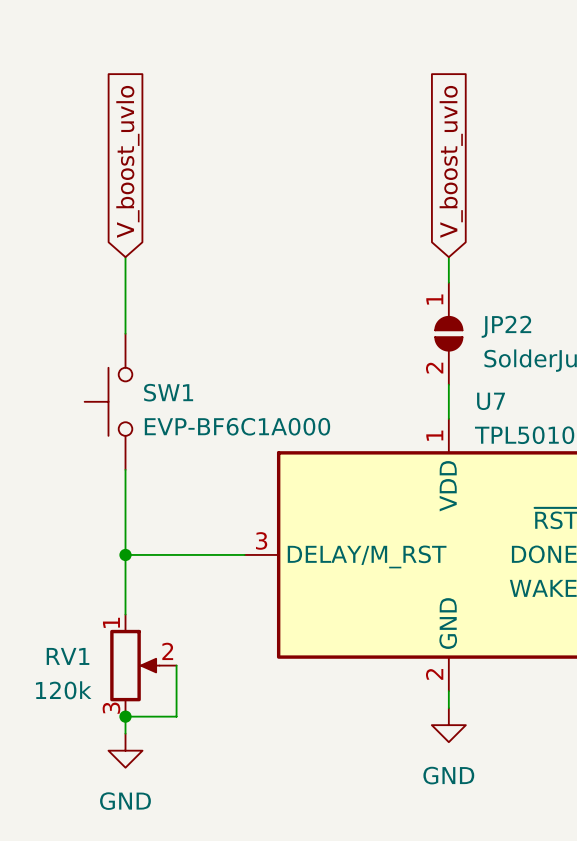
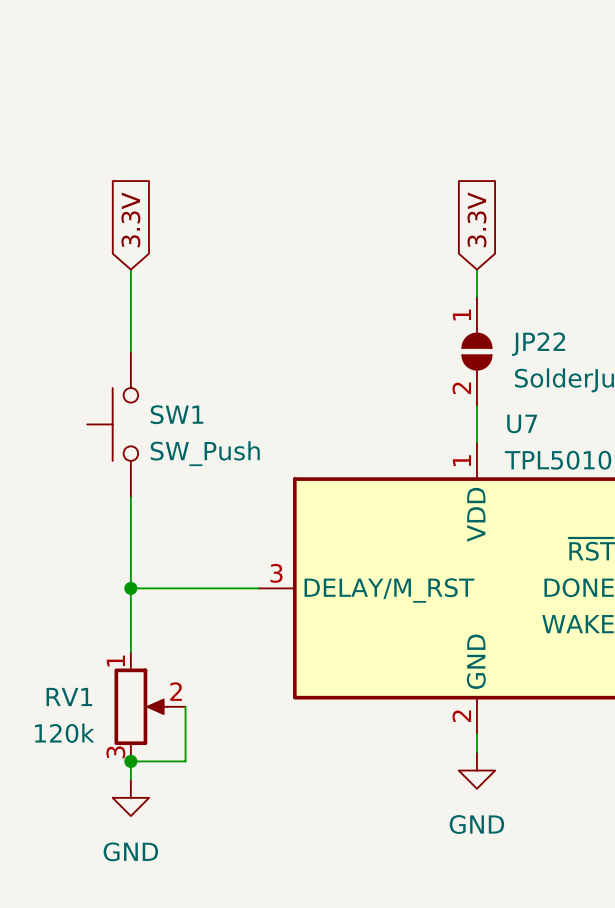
global label: V_boost_uvlo (127, 161) -> 3.3V (130, 219)
global label: V_boost_uvlo (451, 161) -> 3.3V (476, 219)
SW1 value: EVP-BF6C1A000 (237, 426) -> SW_Push (205, 453)

